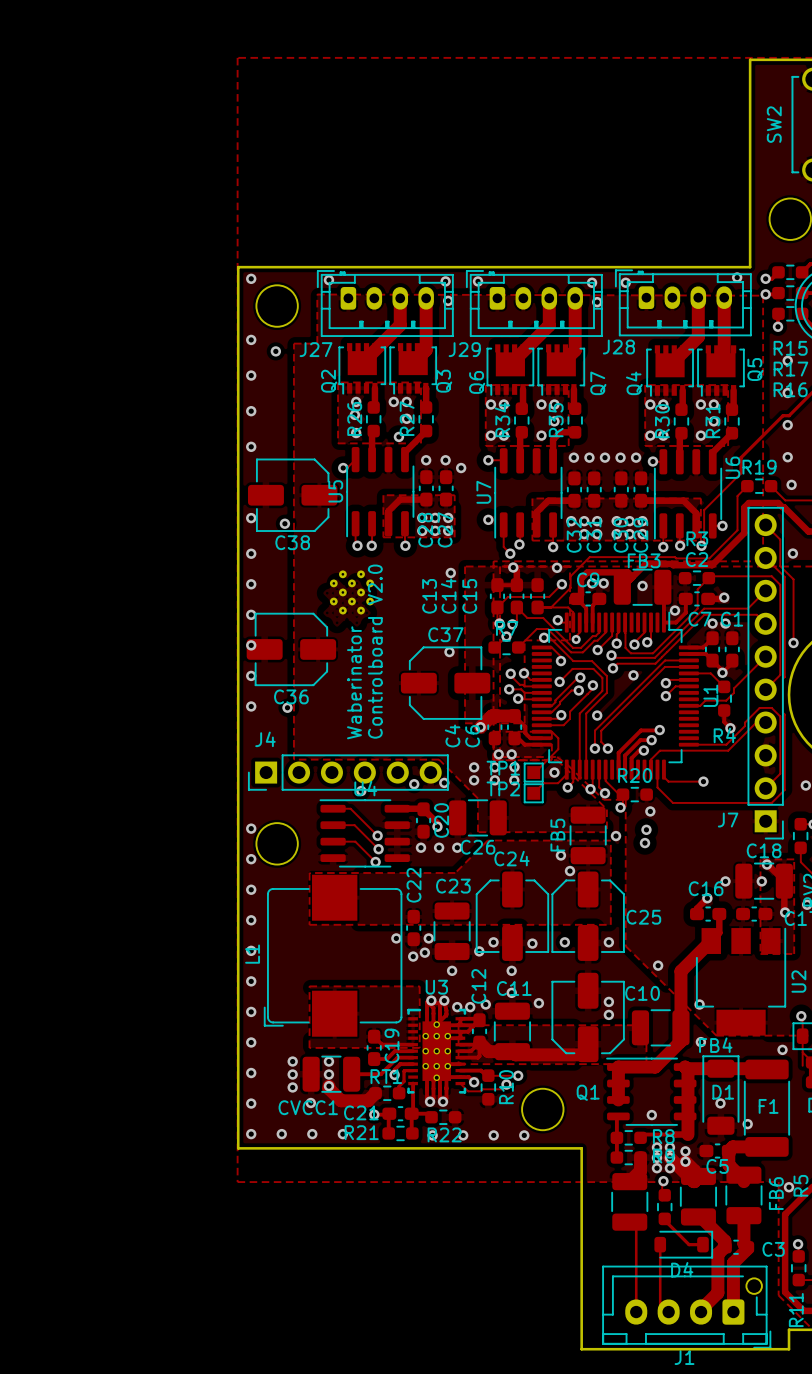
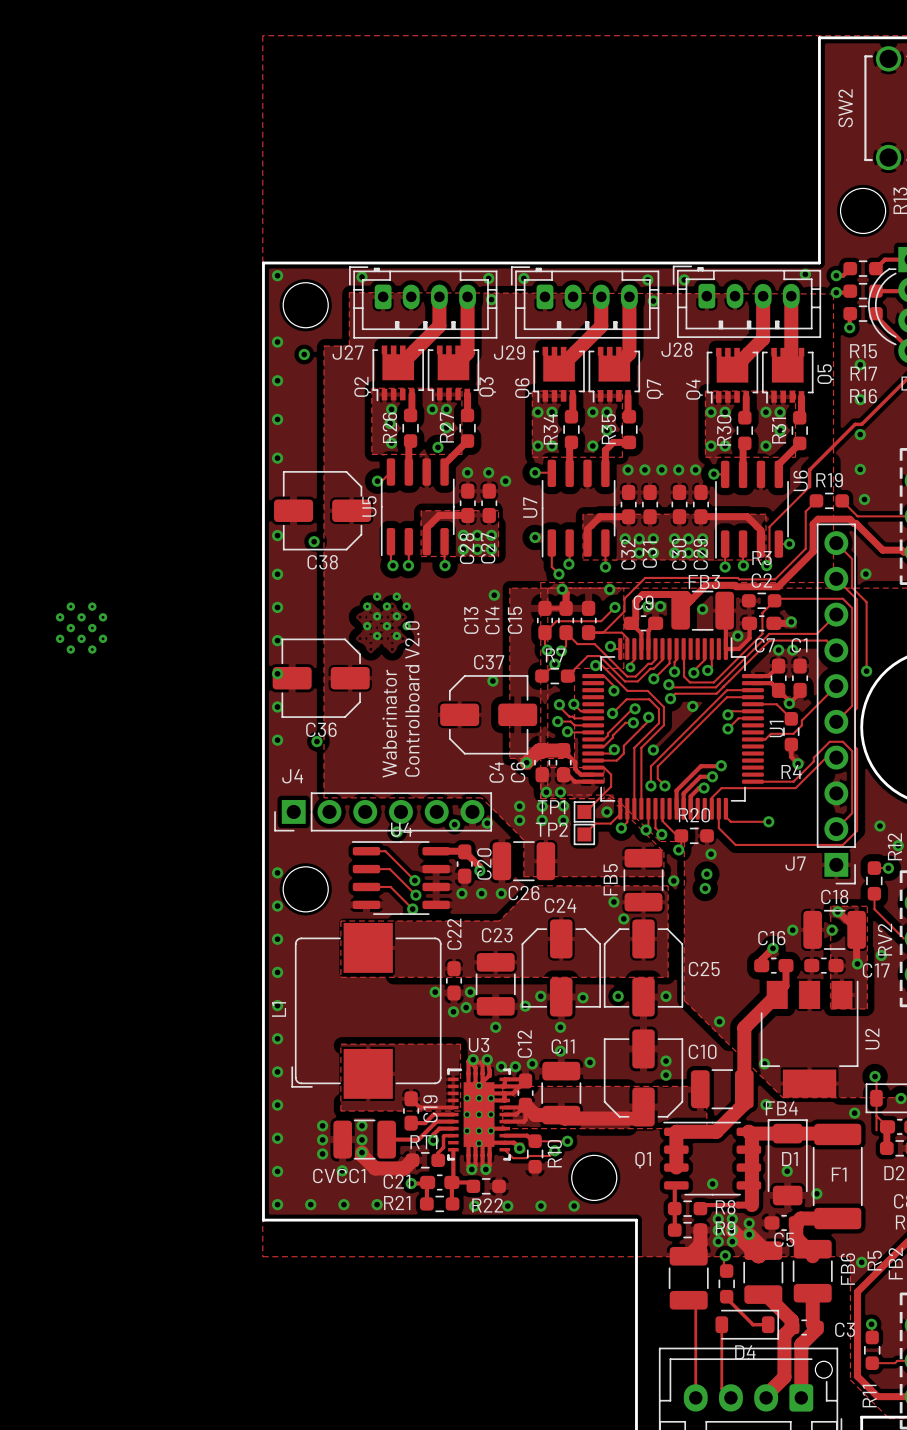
part: none -> (81, 628)

